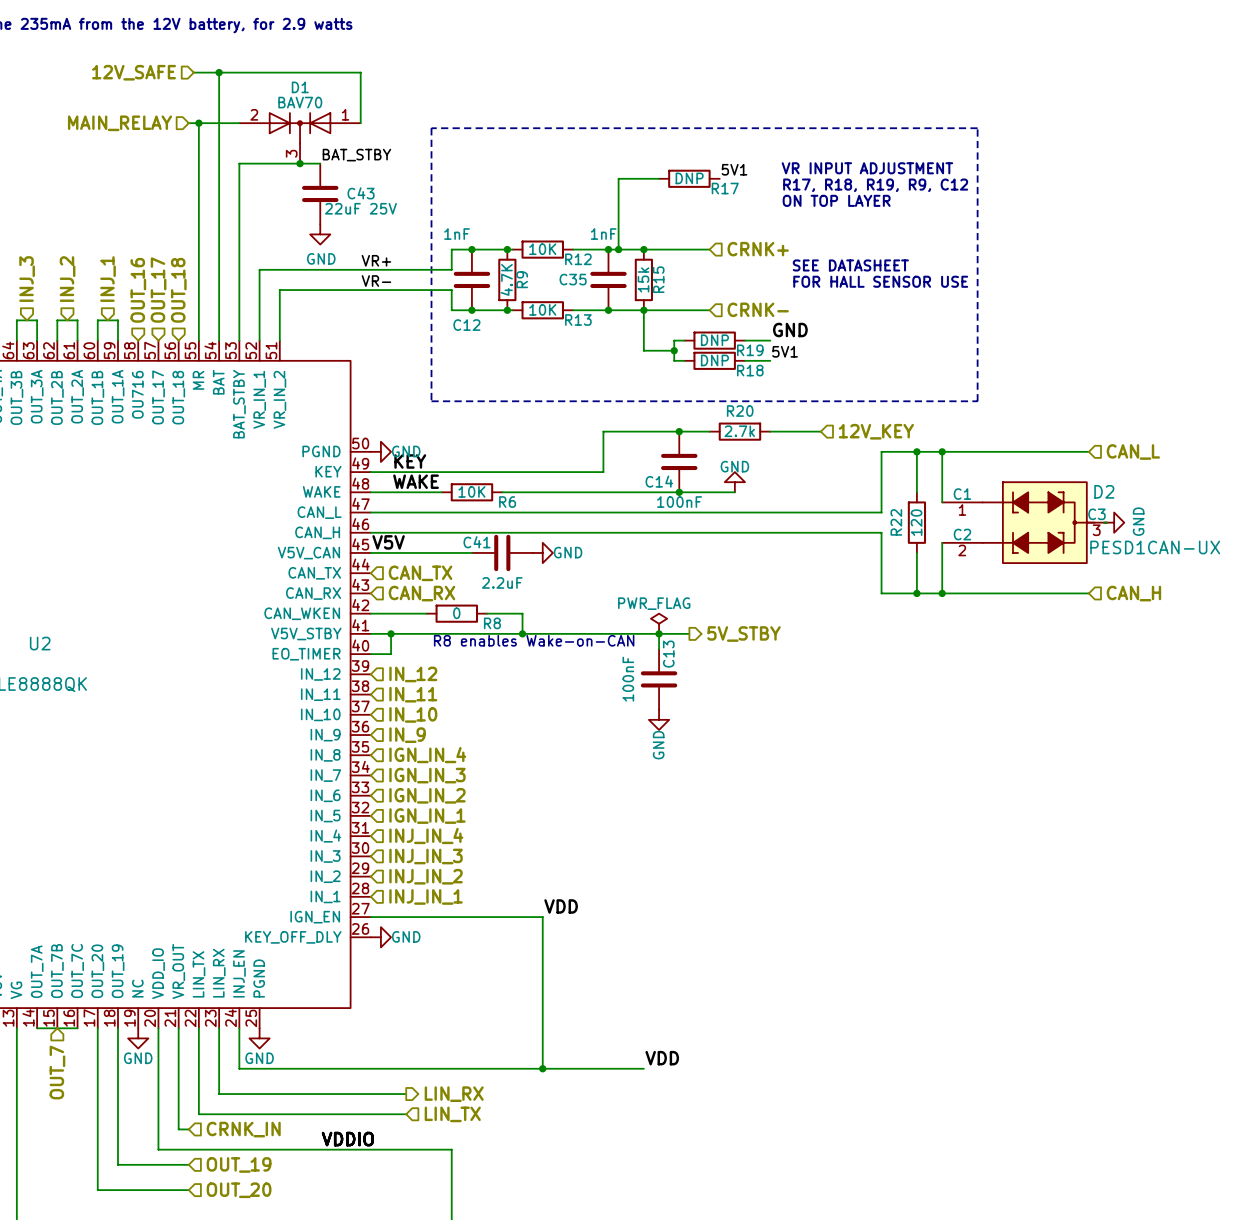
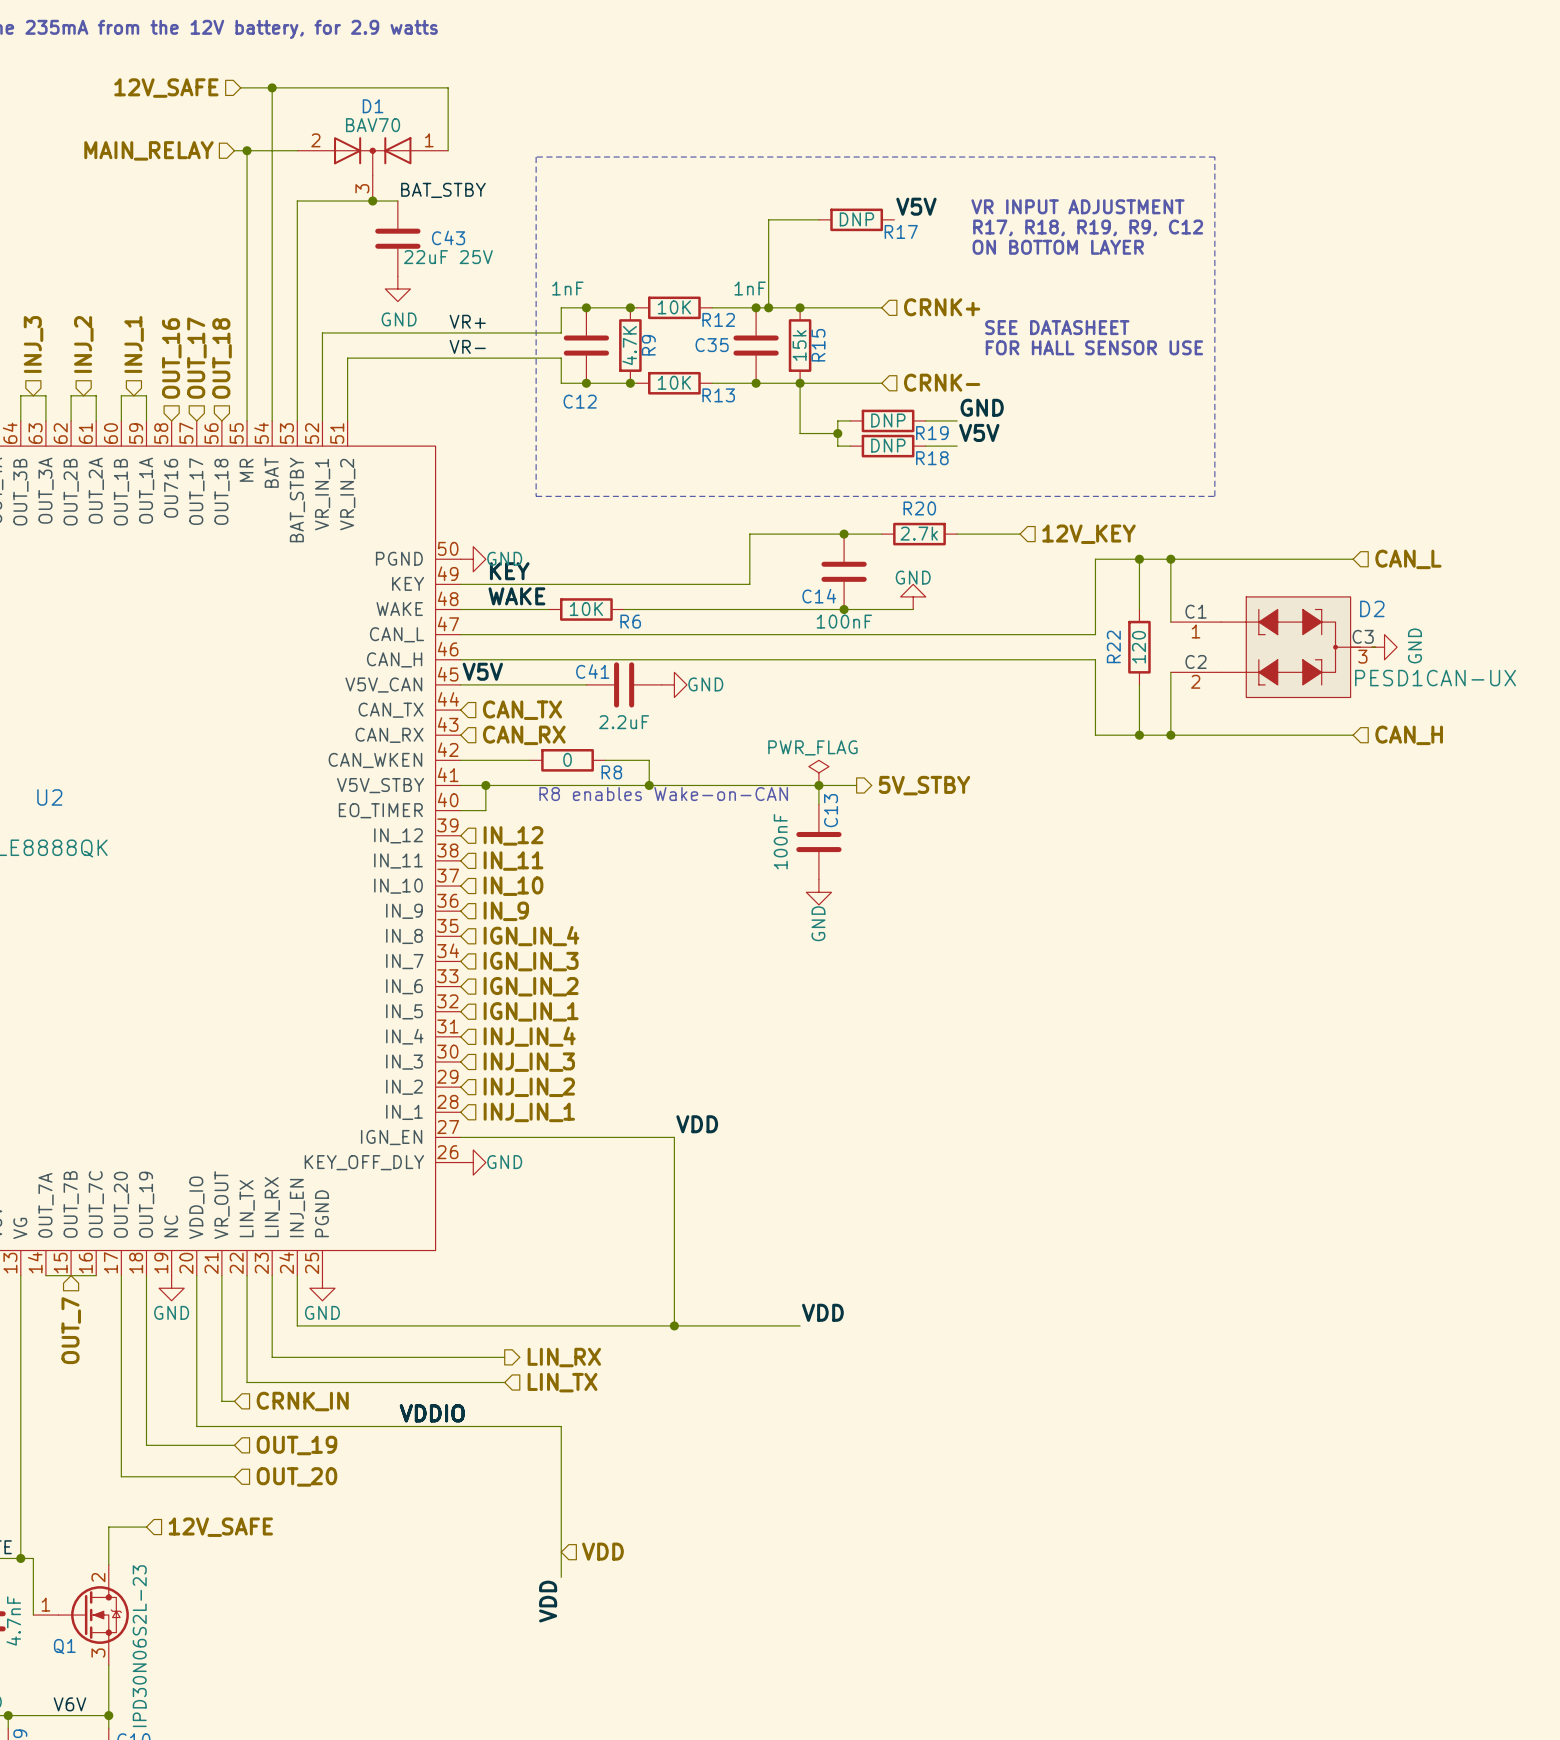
label: 5V1 (734, 169) -> V5V (916, 206)
text: ON TOP LAYER (836, 200) -> ON BOTTOM LAYER (1058, 247)
label: 5V1 (785, 351) -> V5V (979, 432)

